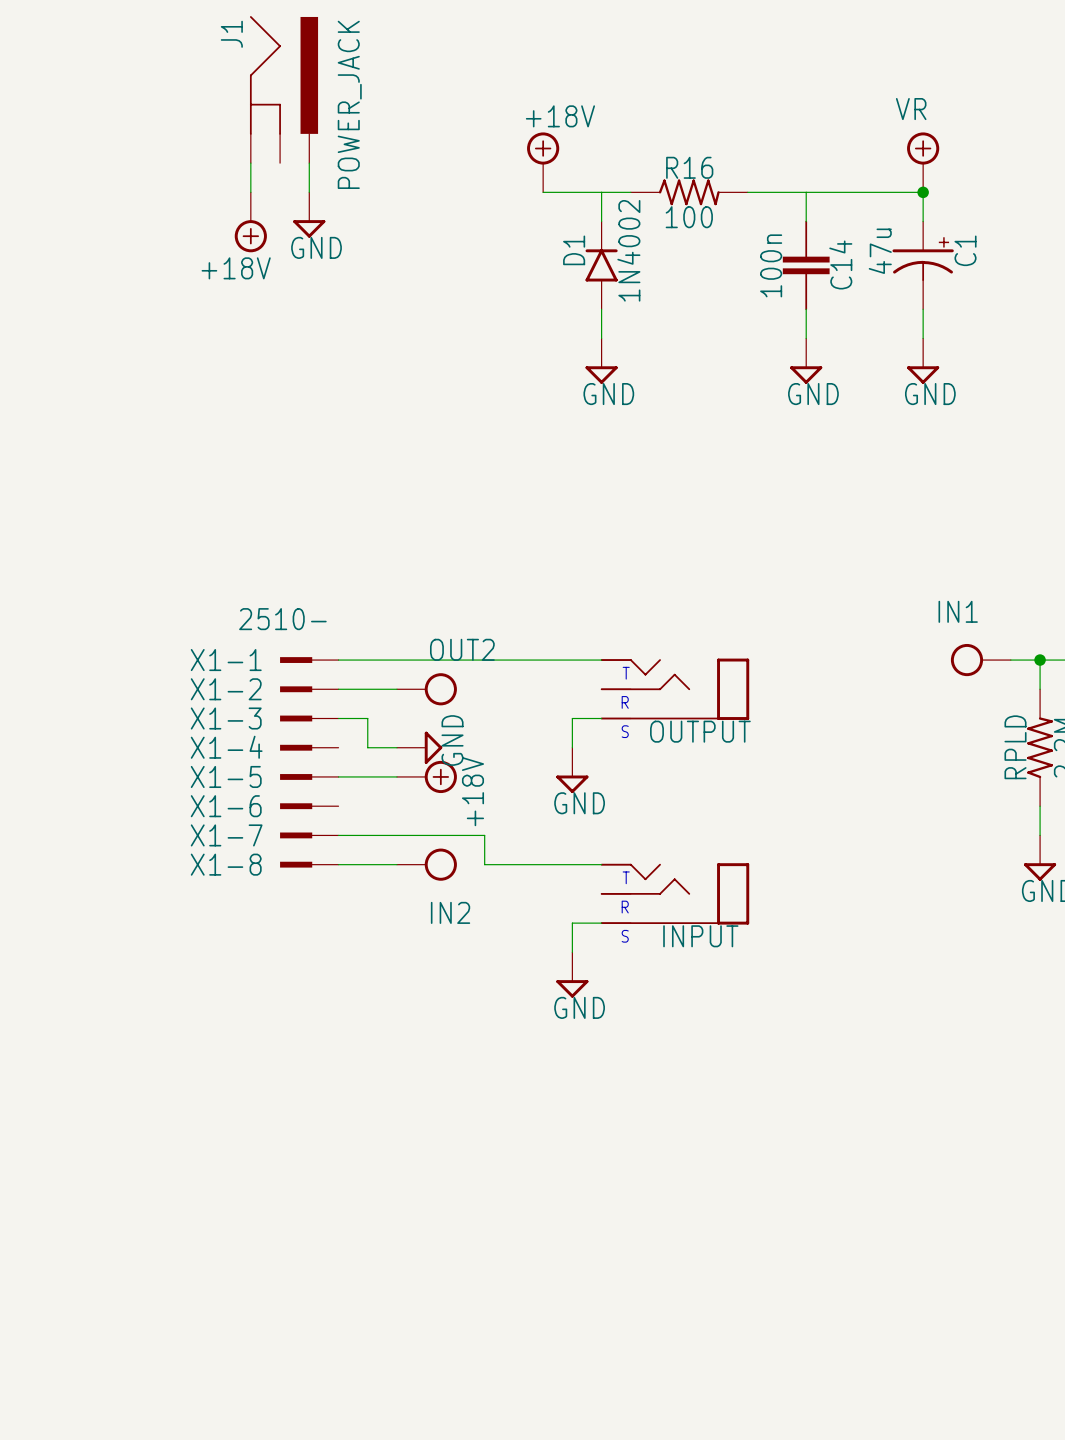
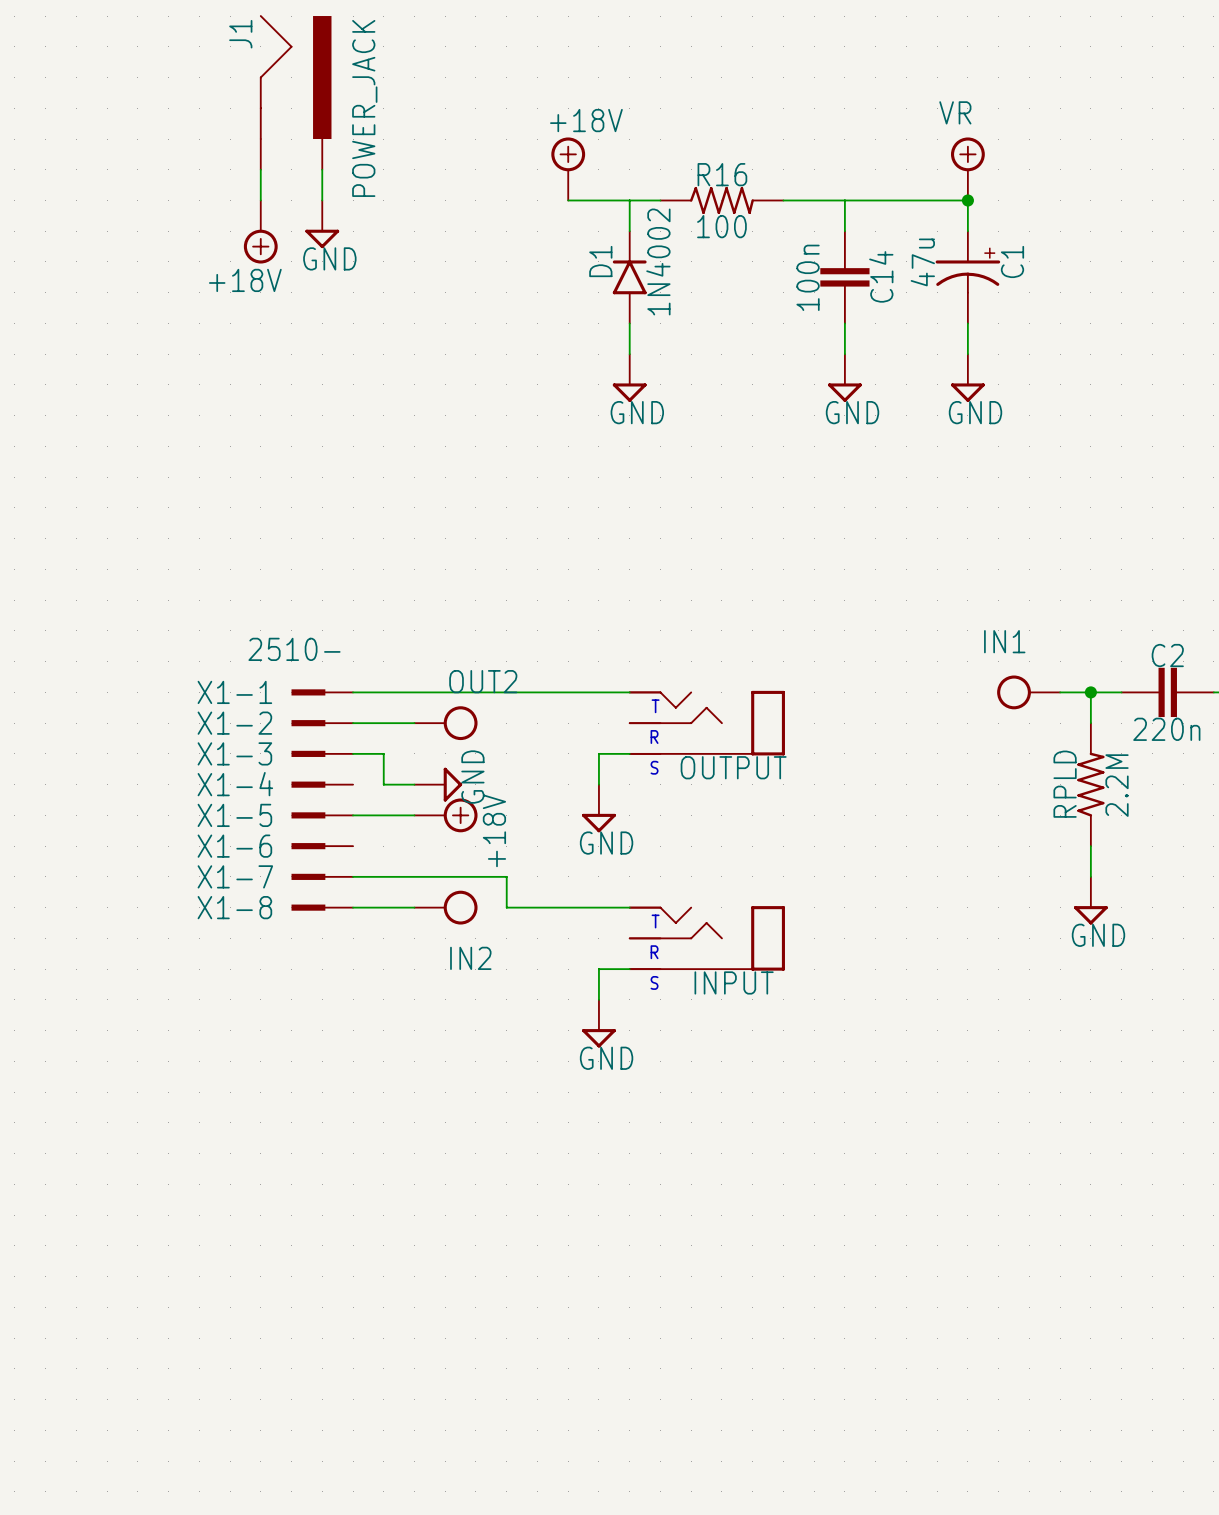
J1 symbol: [249, 16, 319, 164] -> [259, 15, 332, 170]

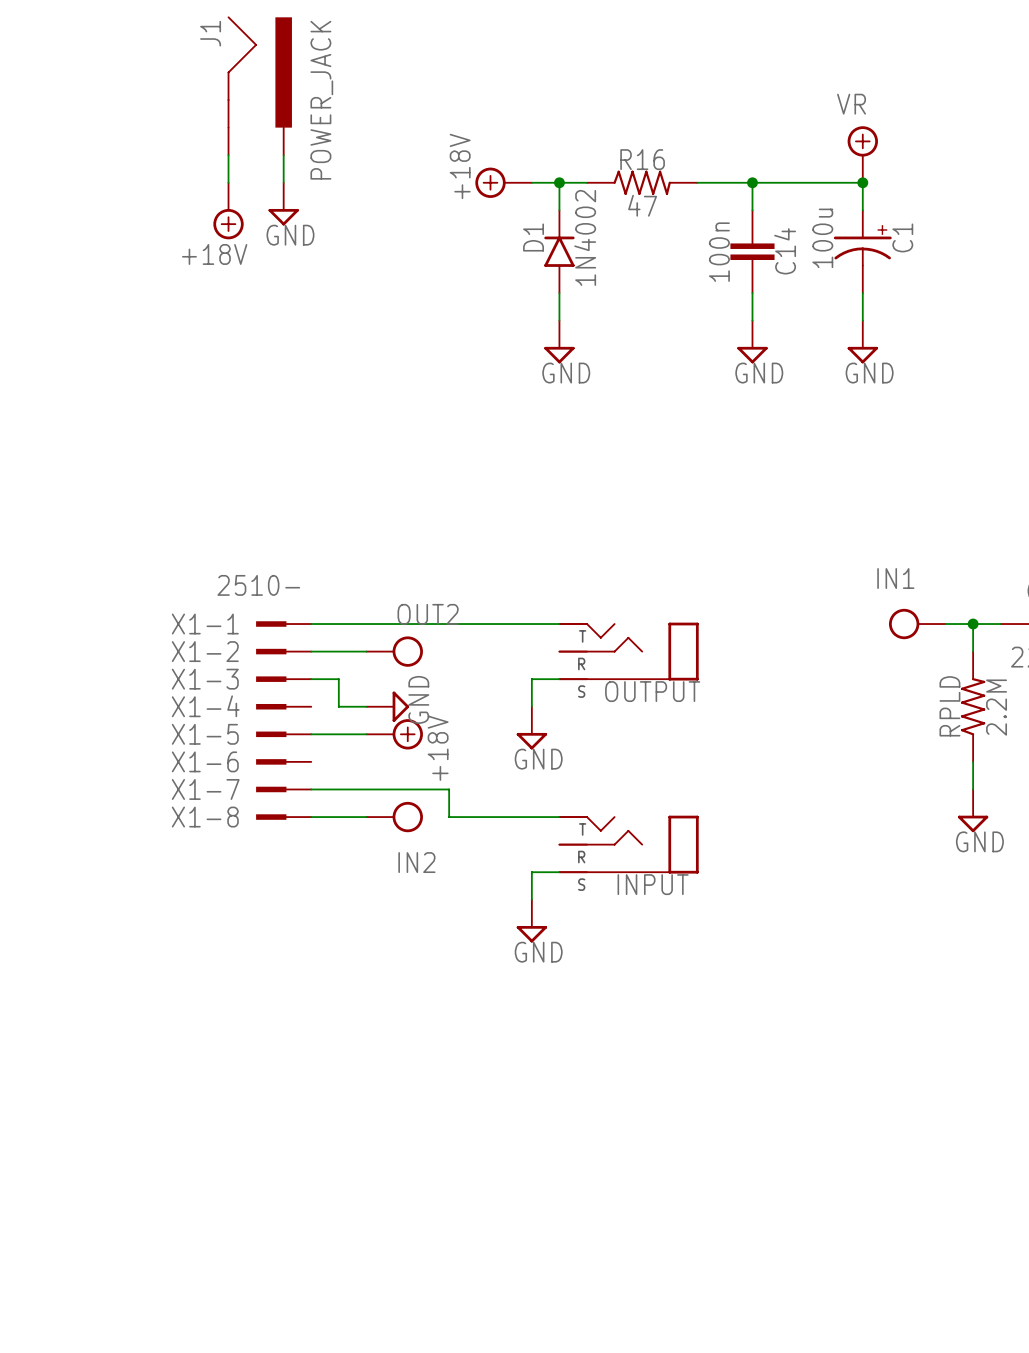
power symbol rotation: 0° (568, 154) -> 90° counterclockwise (490, 182)
junction: none -> (559, 182)
junction: none -> (752, 182)
R16 value: 100 (721, 226) -> 47 (642, 205)
C1 value: 47u (922, 262) -> 100u (822, 238)

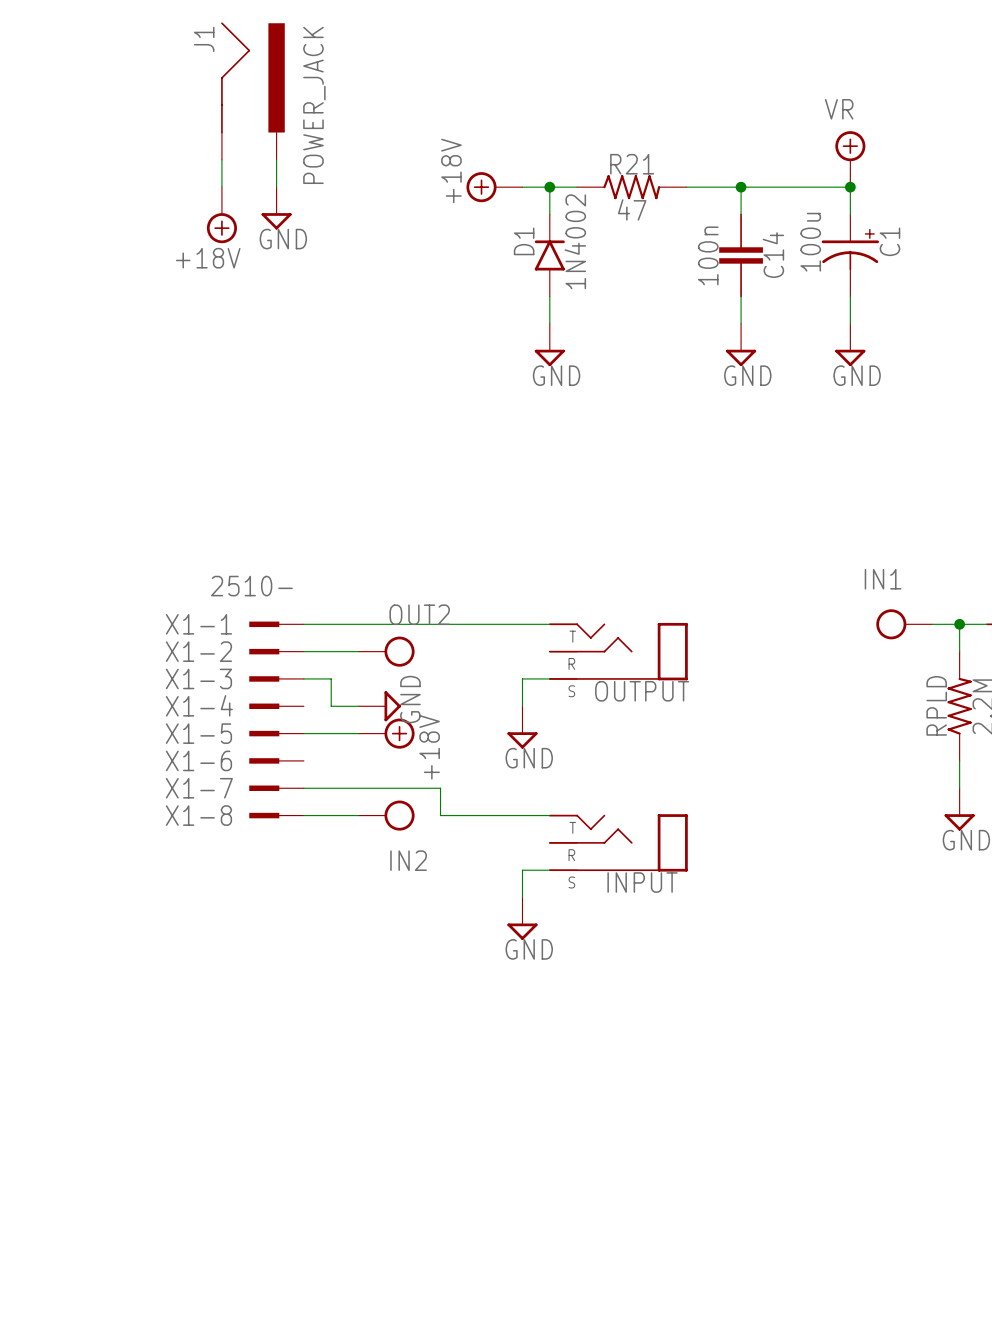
R16 name: R16 (642, 159) -> R21 (632, 164)

